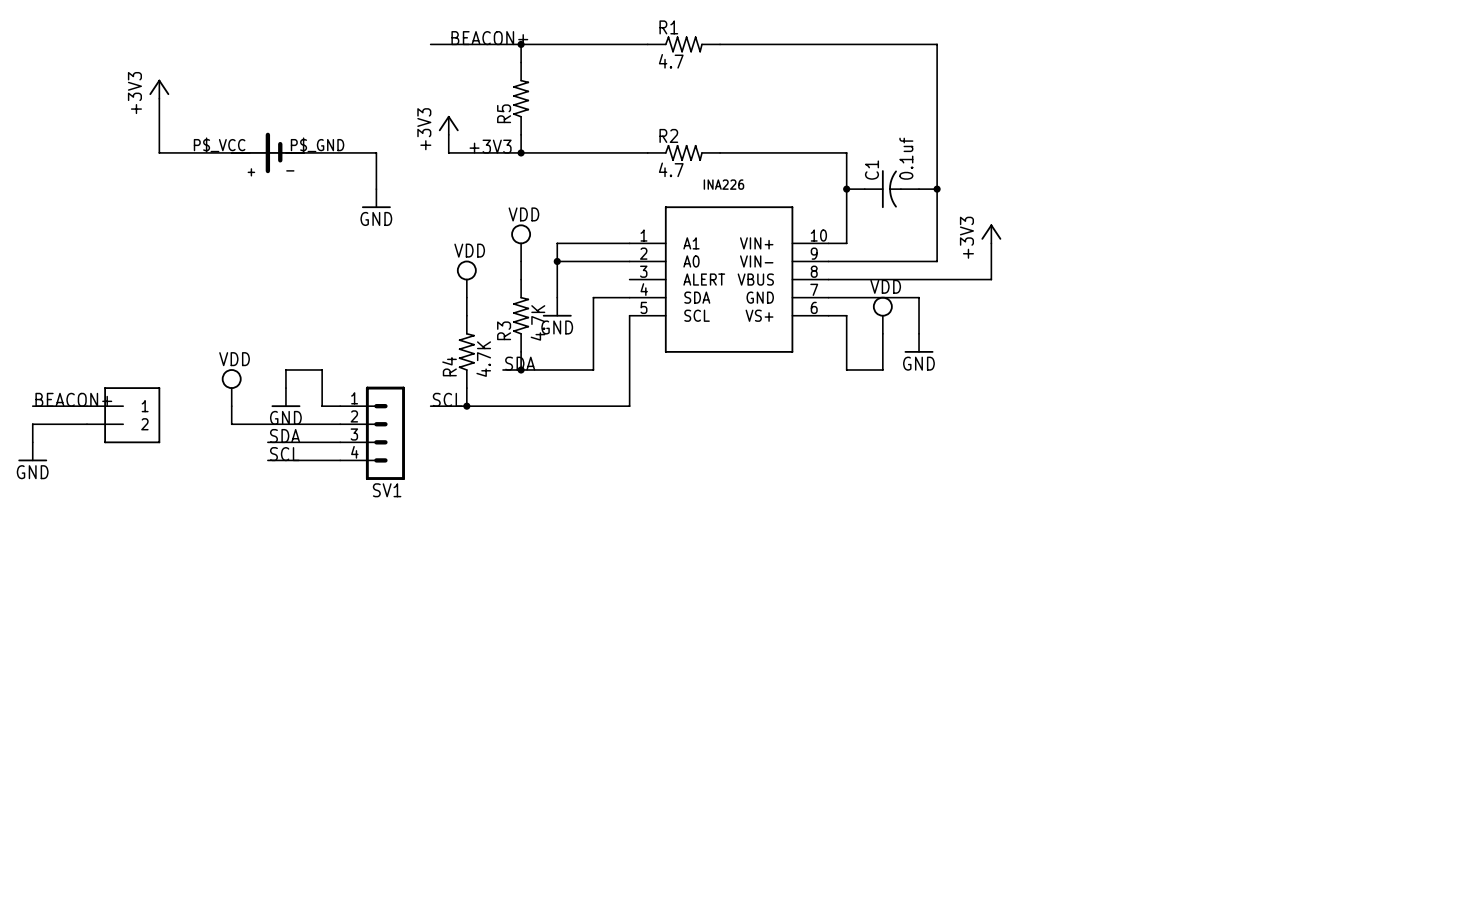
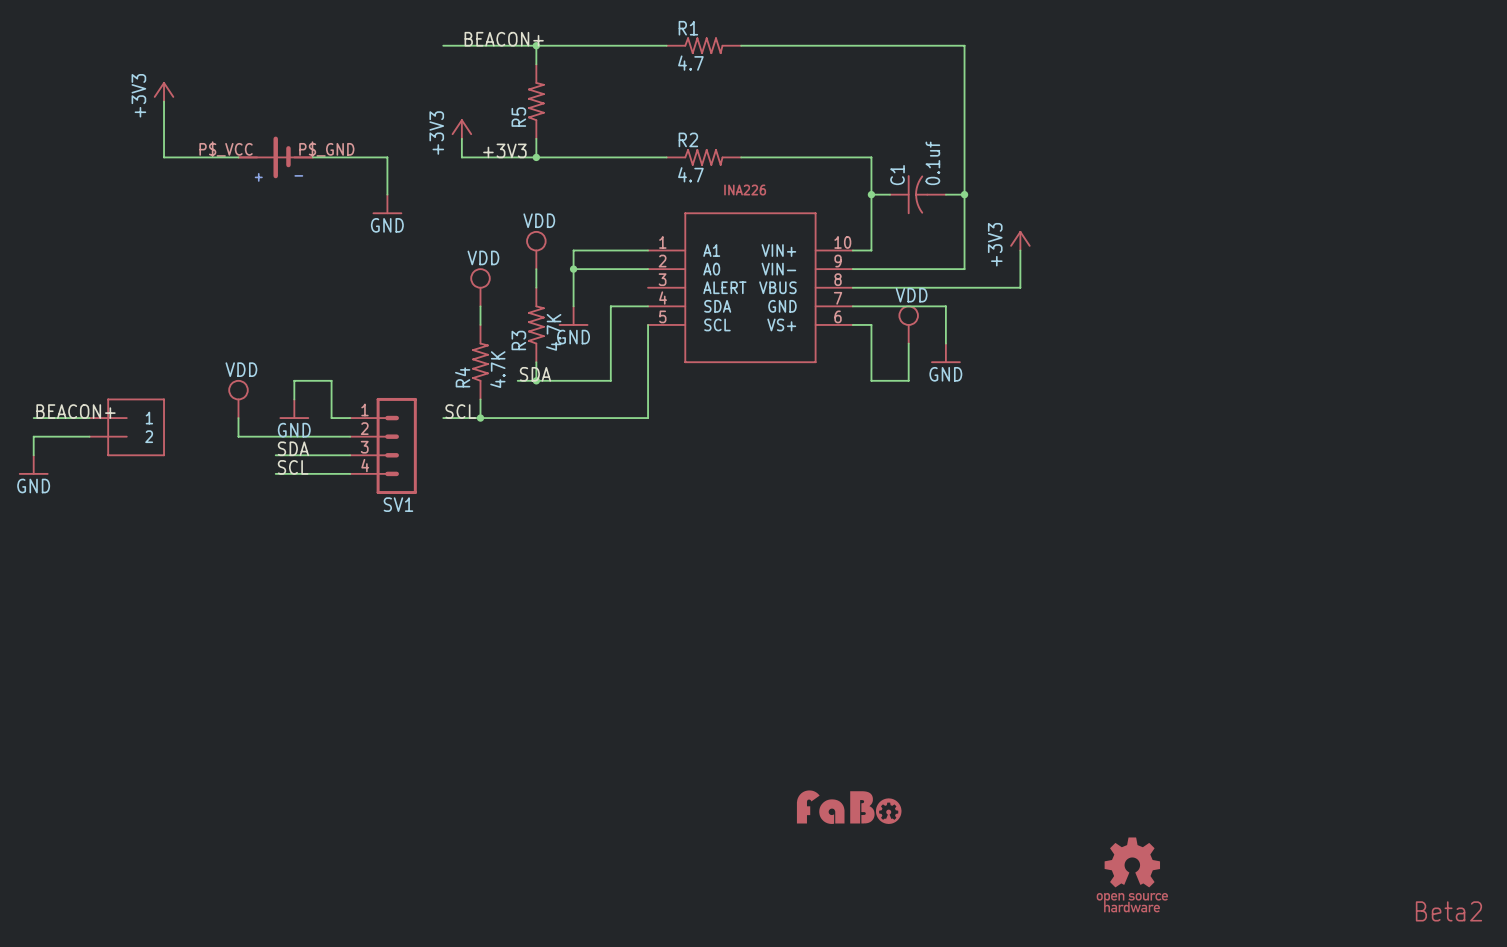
part: none -> (849, 807)
part: none -> (1132, 874)
text: none -> Beta2 (1448, 911)

